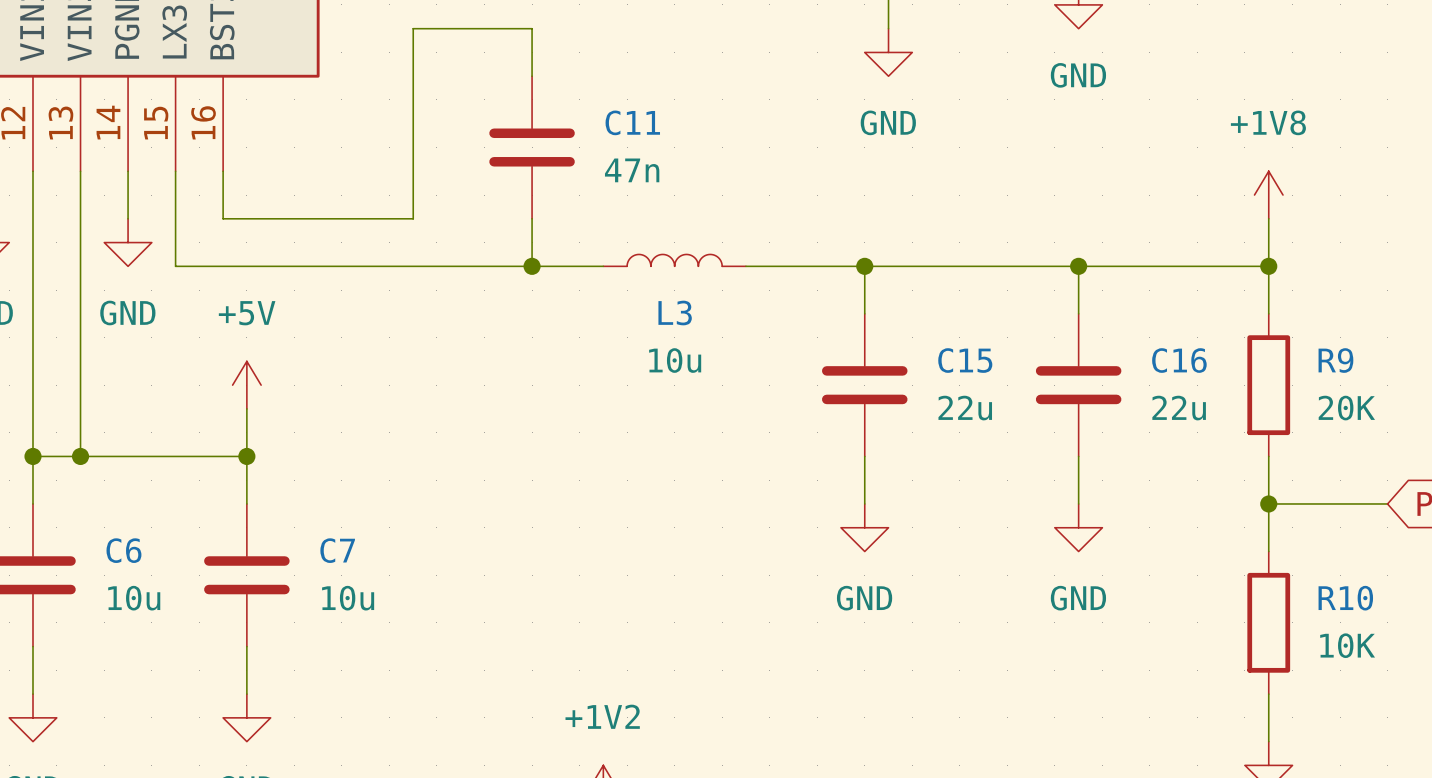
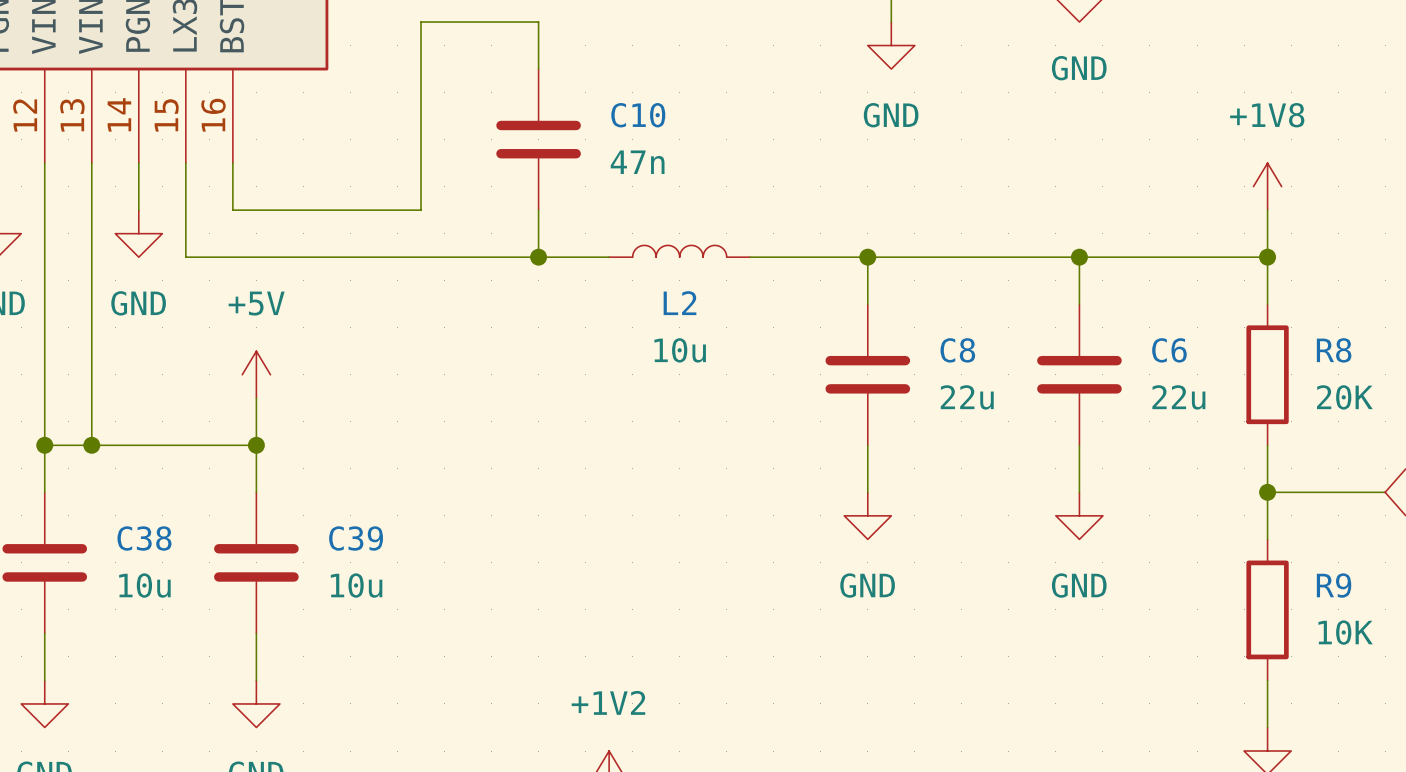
C11 name: C11 (632, 122) -> C10 (638, 115)
L3 name: L3 (675, 312) -> L2 (679, 303)
C15 name: C15 (965, 360) -> C8 (957, 350)
C16 name: C16 (1179, 360) -> C6 (1169, 350)
R9 name: R9 (1335, 360) -> R8 (1334, 350)
C6 name: C6 (123, 550) -> C38 (144, 538)
C7 name: C7 (337, 550) -> C39 (356, 538)
R10 name: R10 (1345, 598) -> R9 (1334, 585)

